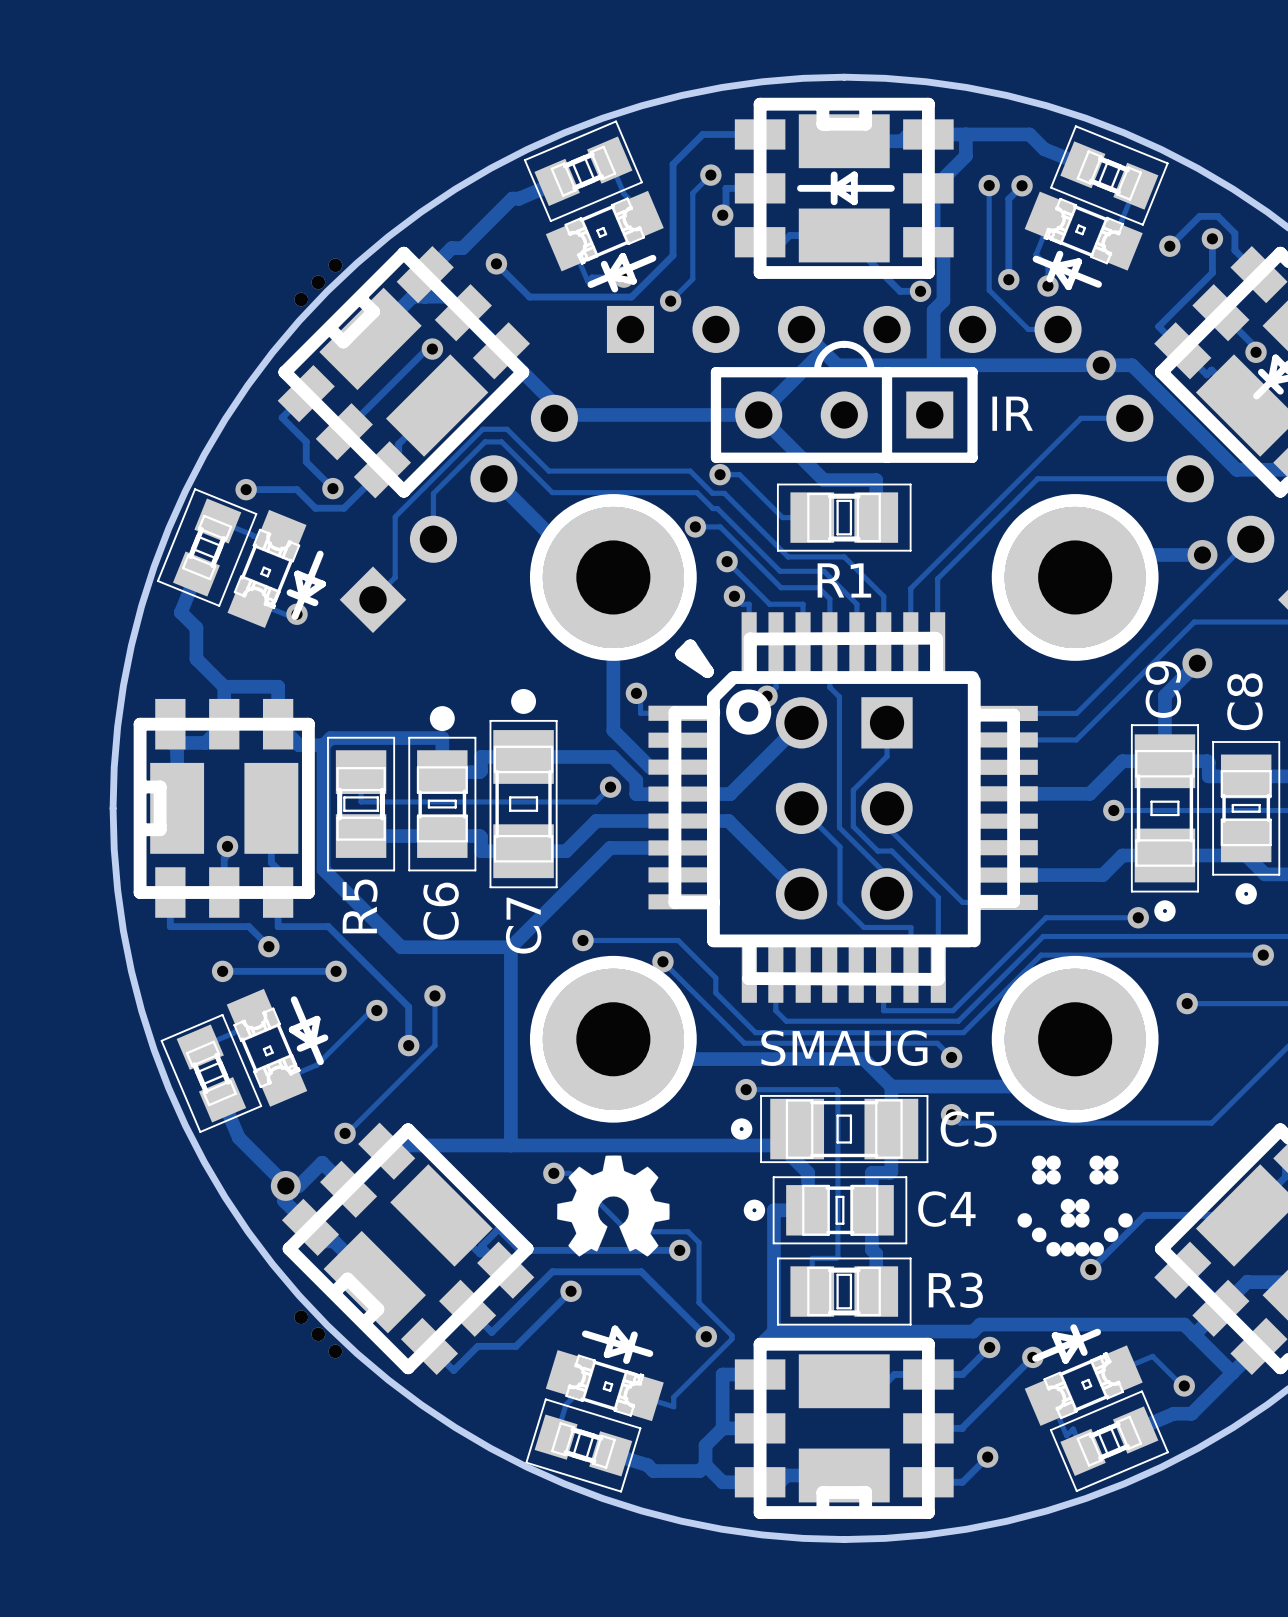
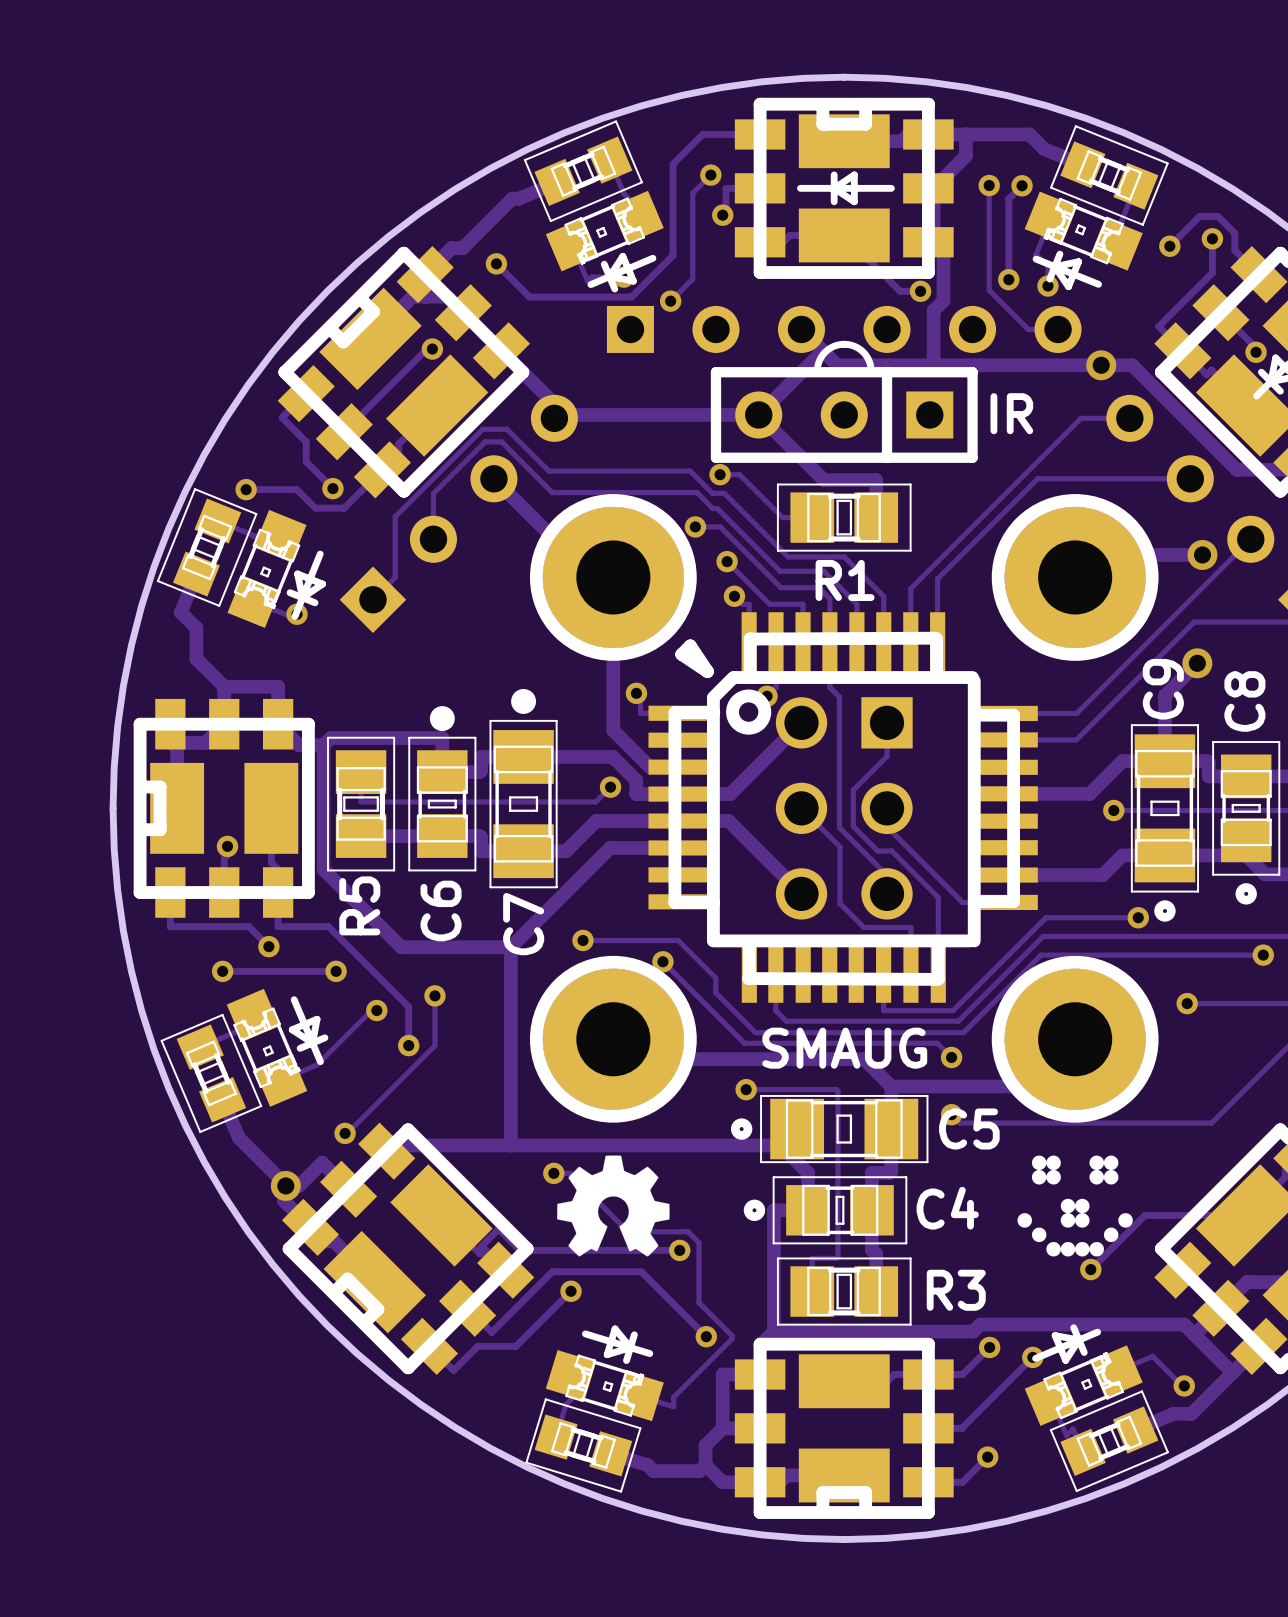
part: (335, 265) -> none
part: (318, 282) -> none
part: (301, 299) -> none
part: (301, 1317) -> none
part: (318, 1334) -> none
part: (335, 1351) -> none

